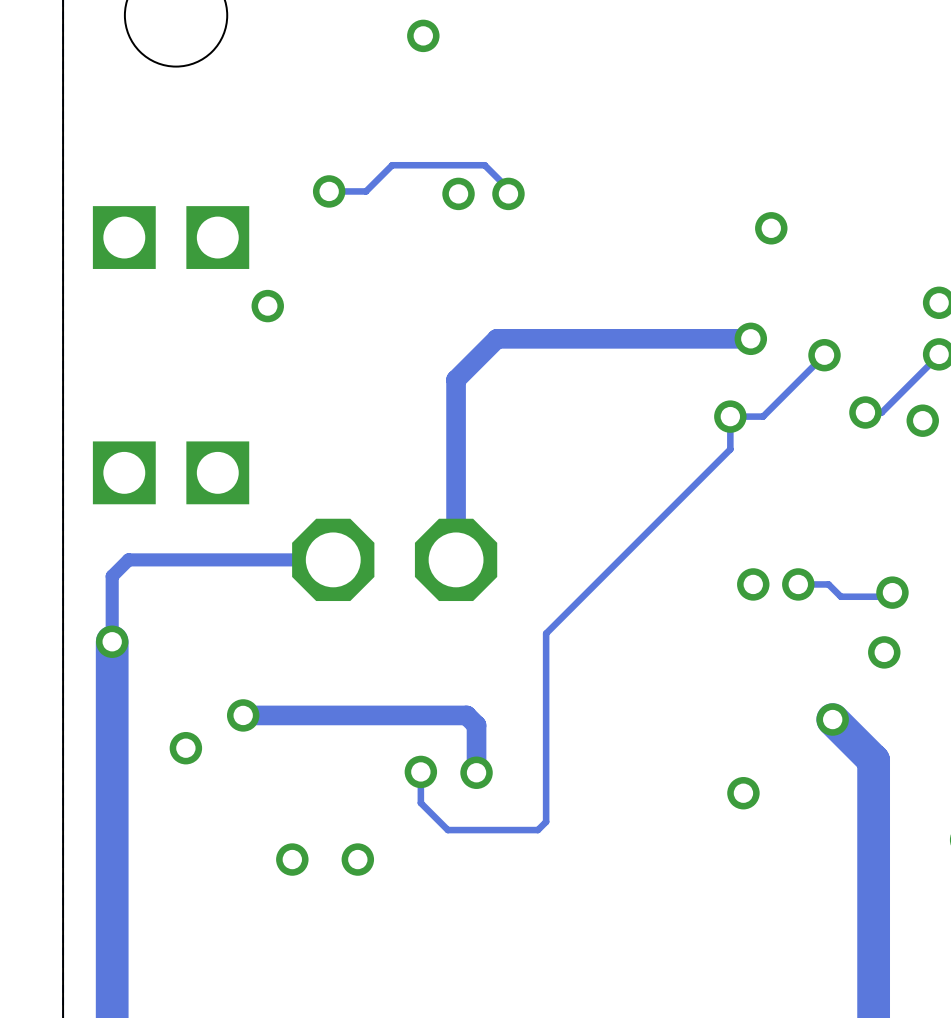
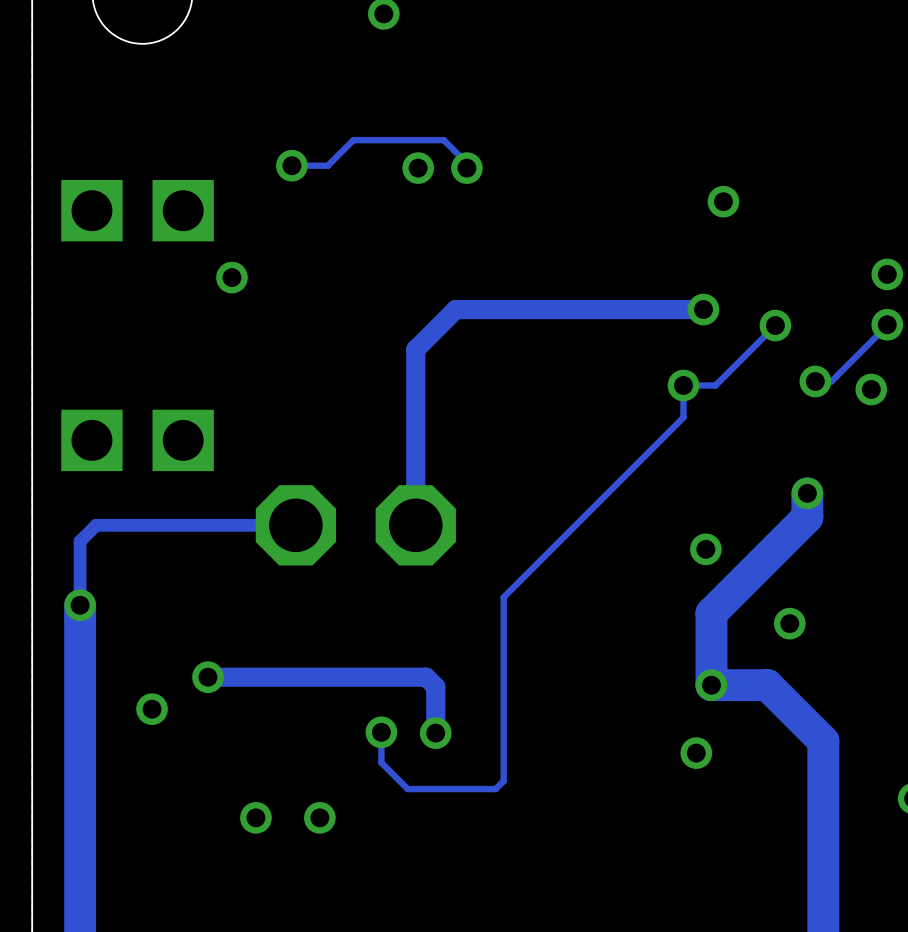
via: none -> (807, 493)
track: (798, 584) (828, 584) (840, 596) (888, 596) (892, 592) -> none
via: (798, 584) -> none
via: (892, 592) -> none
via: (884, 652) -> none
via: none -> (789, 623)
track: (832, 719) (873, 760) (873, 780) -> (807, 493) (807, 517) (711, 613) (711, 685) (767, 685) (823, 741)
via: (832, 719) -> none
via: none -> (711, 685)

